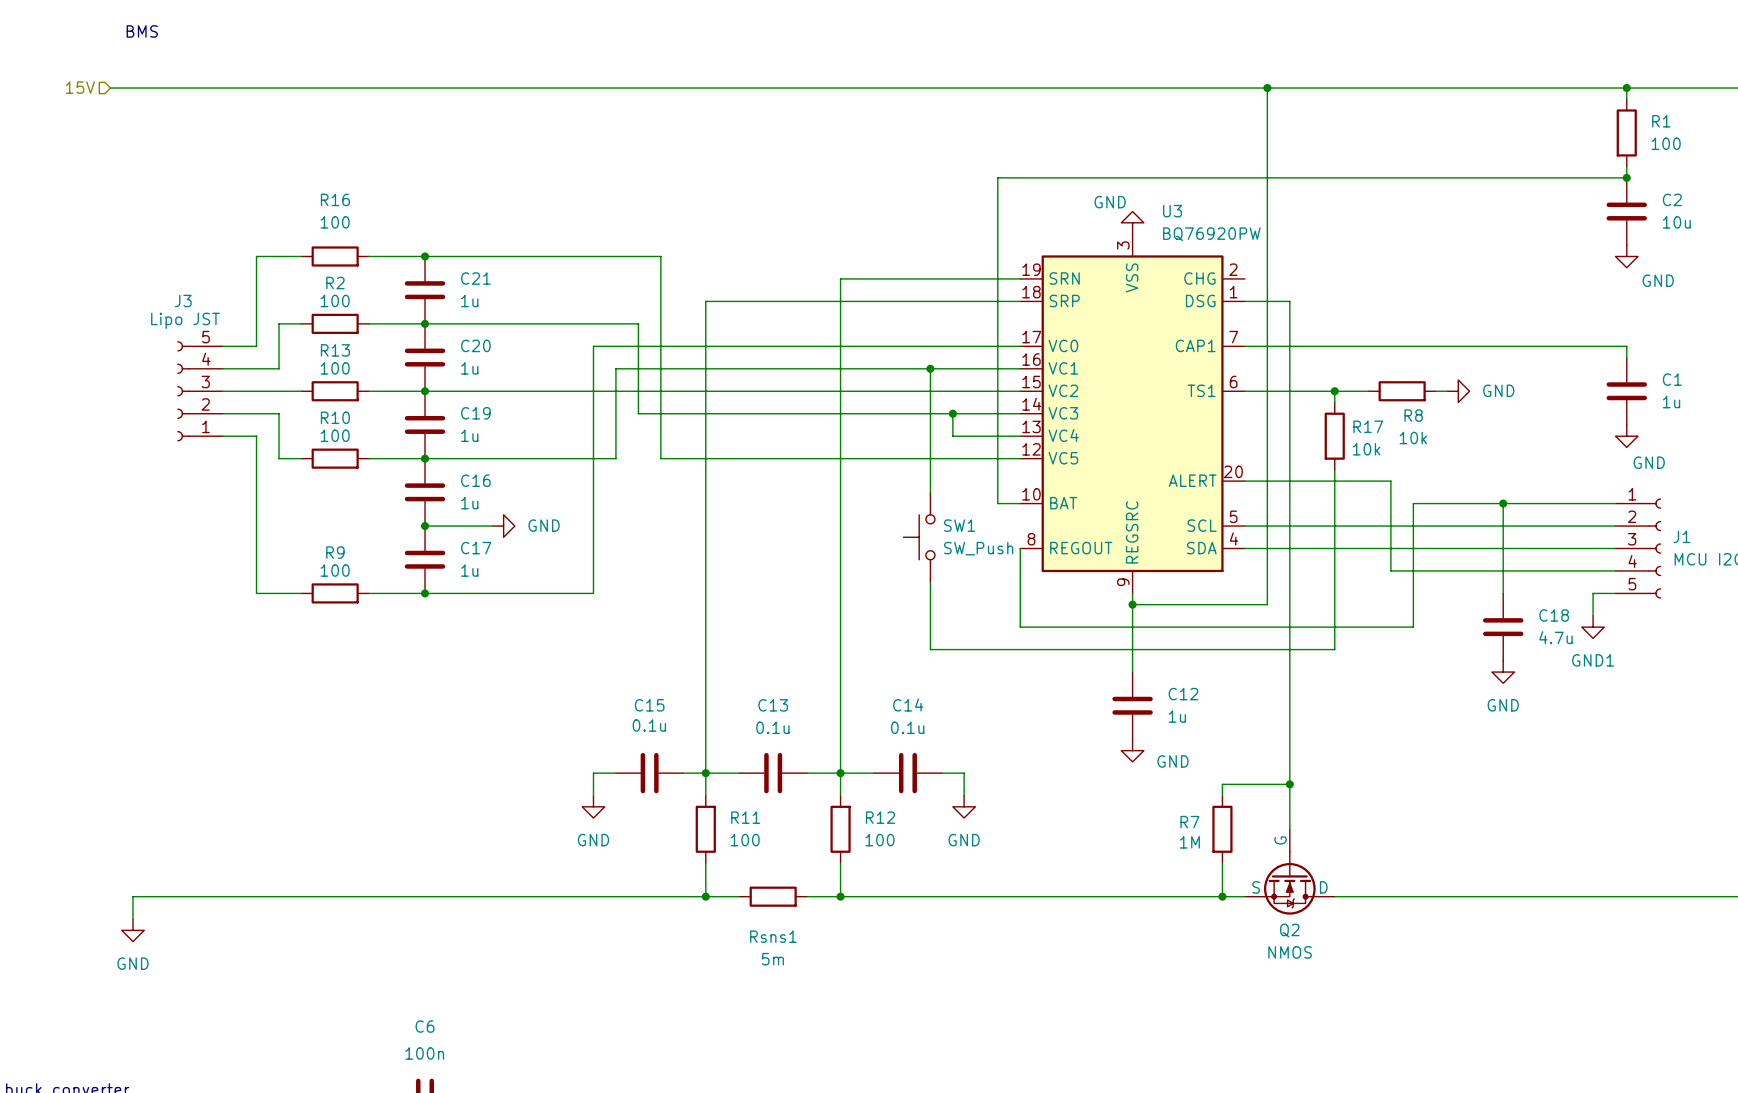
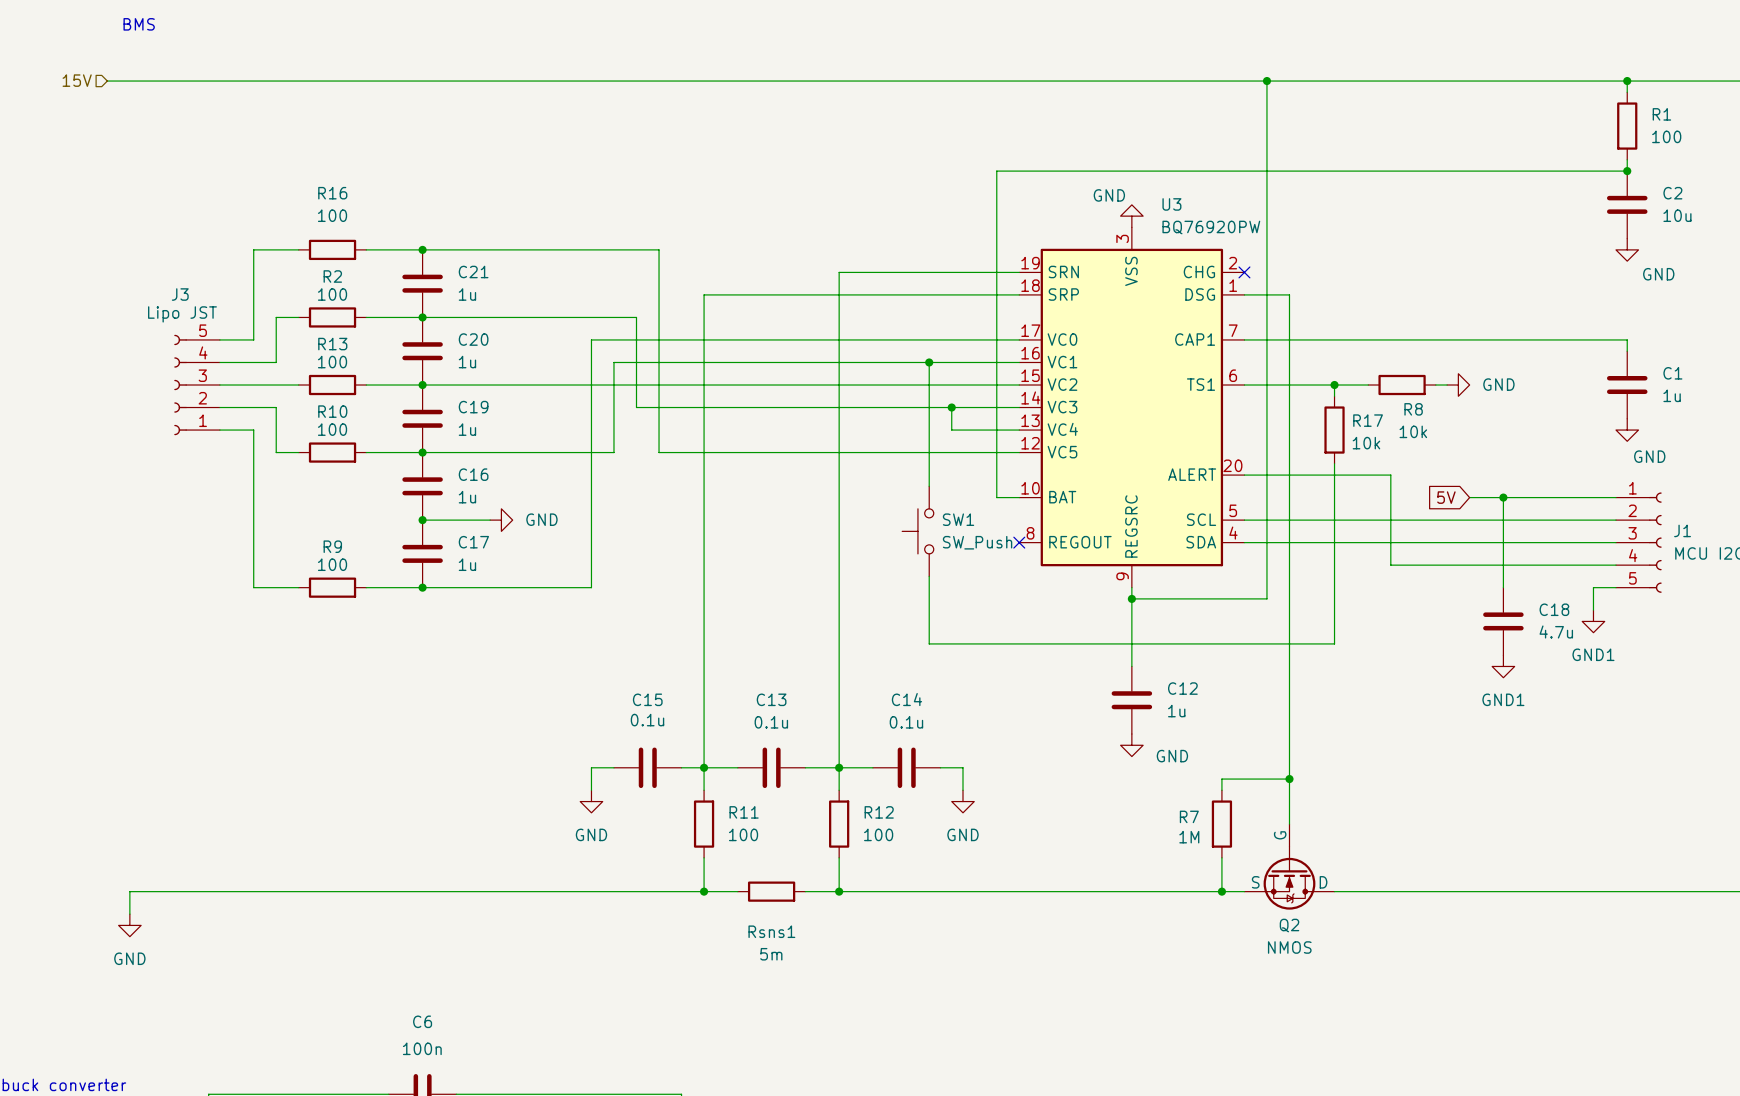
no-connect mark: none -> (1244, 272)
global label: none -> 5V (1446, 497)
wire: (1469, 503) (1413, 503) (1413, 627) (1020, 627) (1020, 548) -> none
no-connect mark: none -> (1019, 542)
power symbol: GND (1503, 672) -> GND1 (1503, 666)

